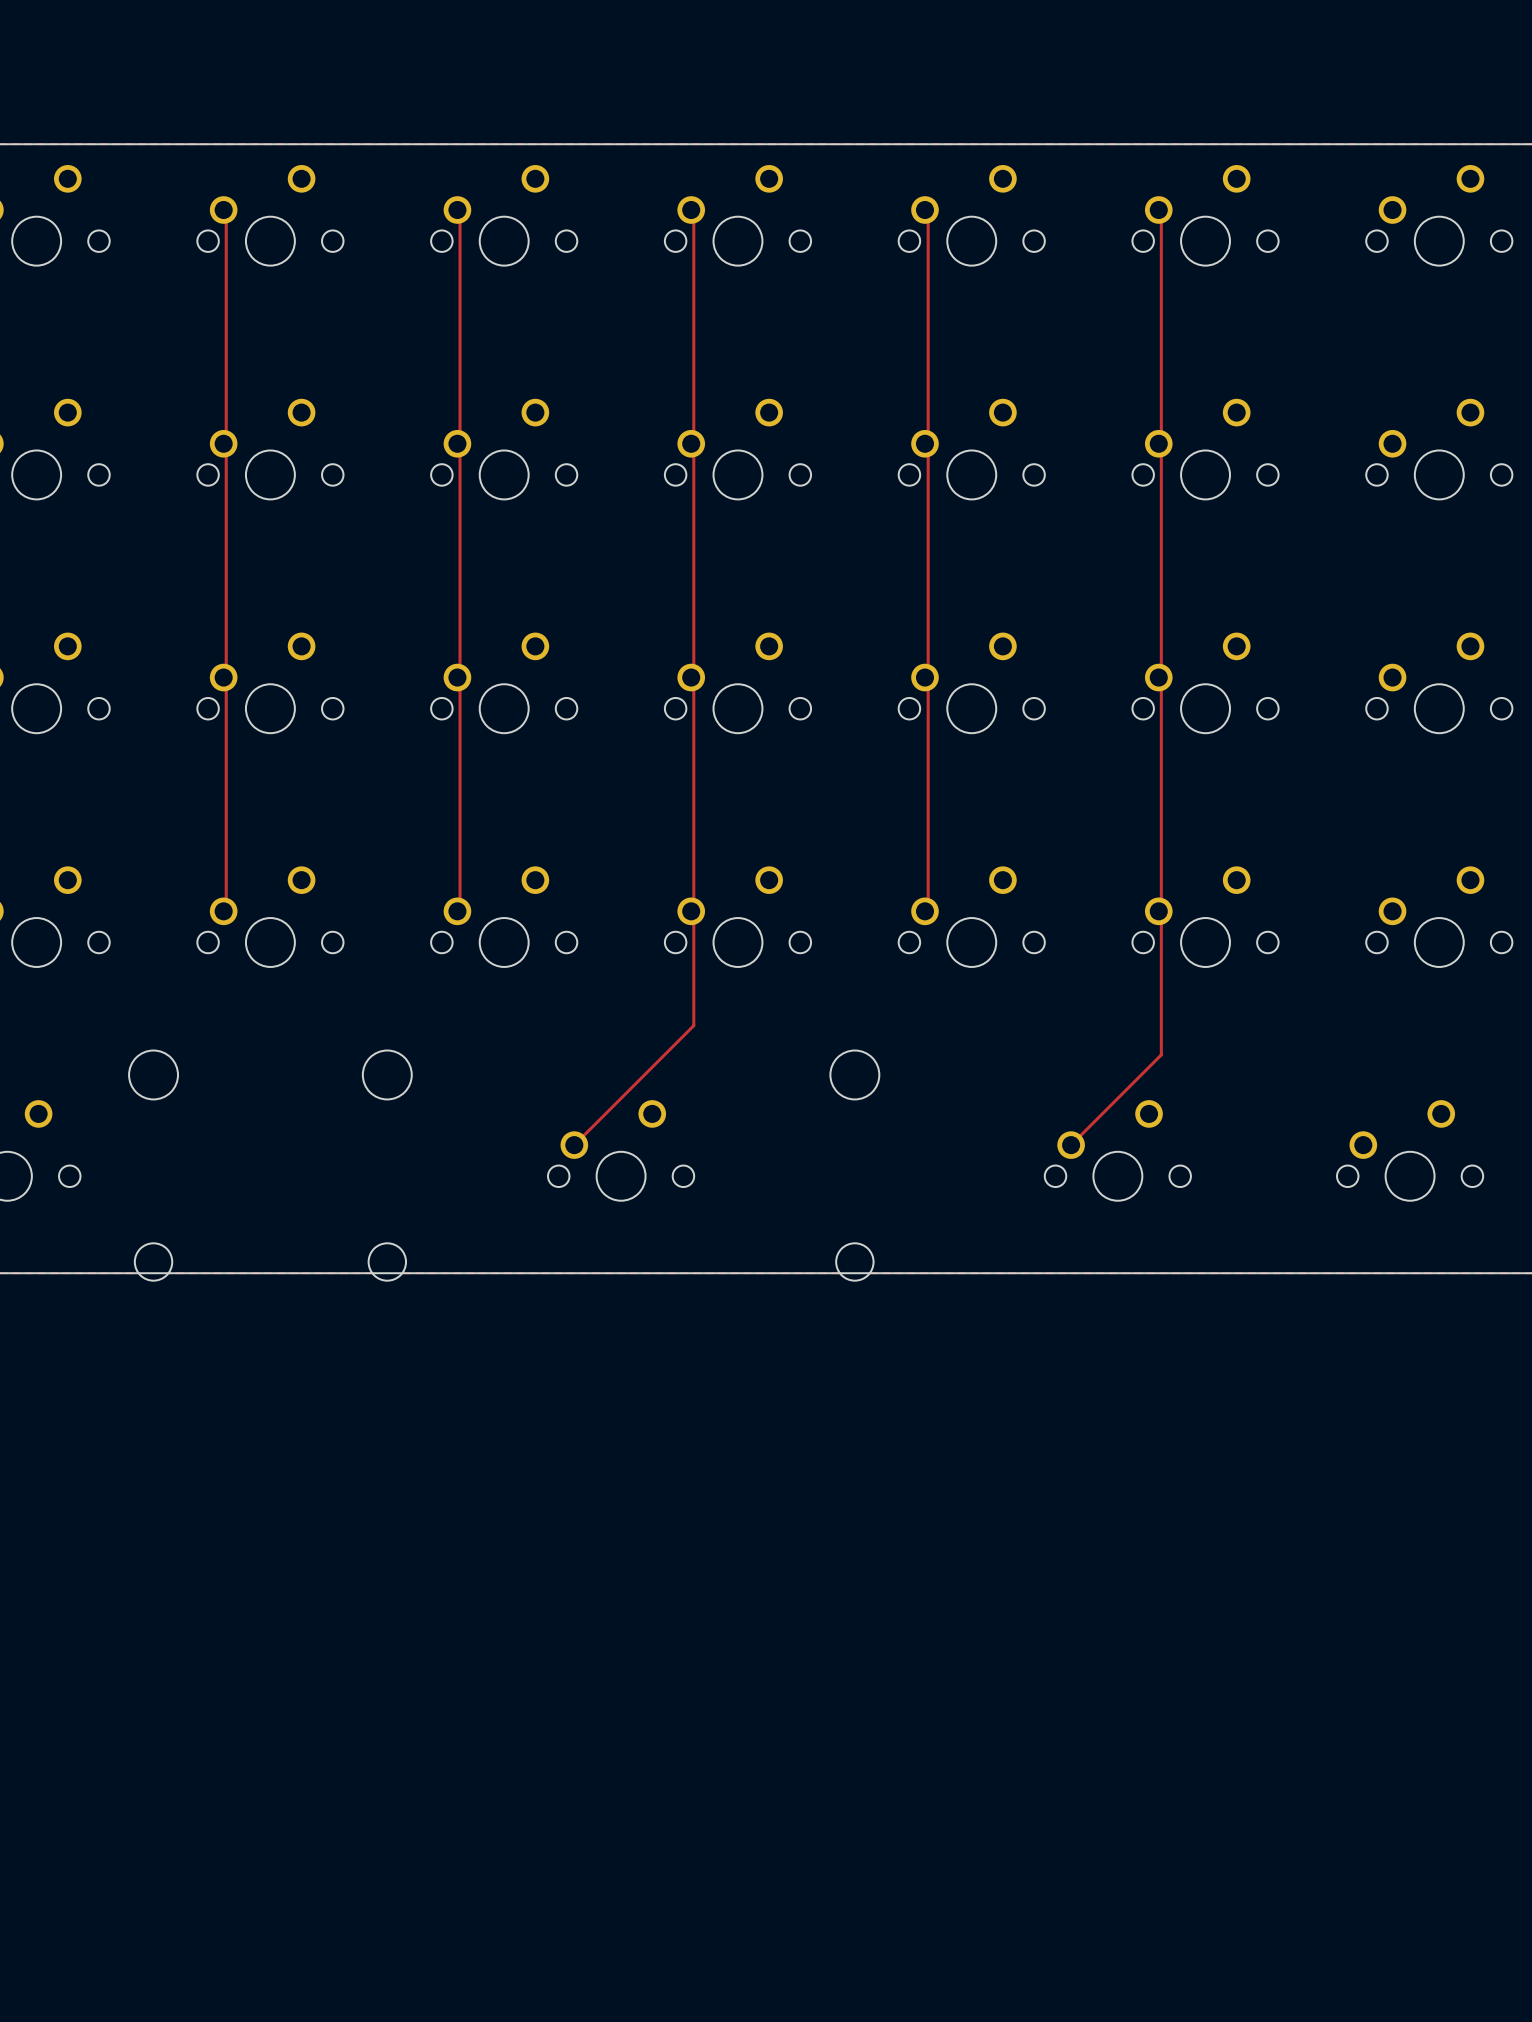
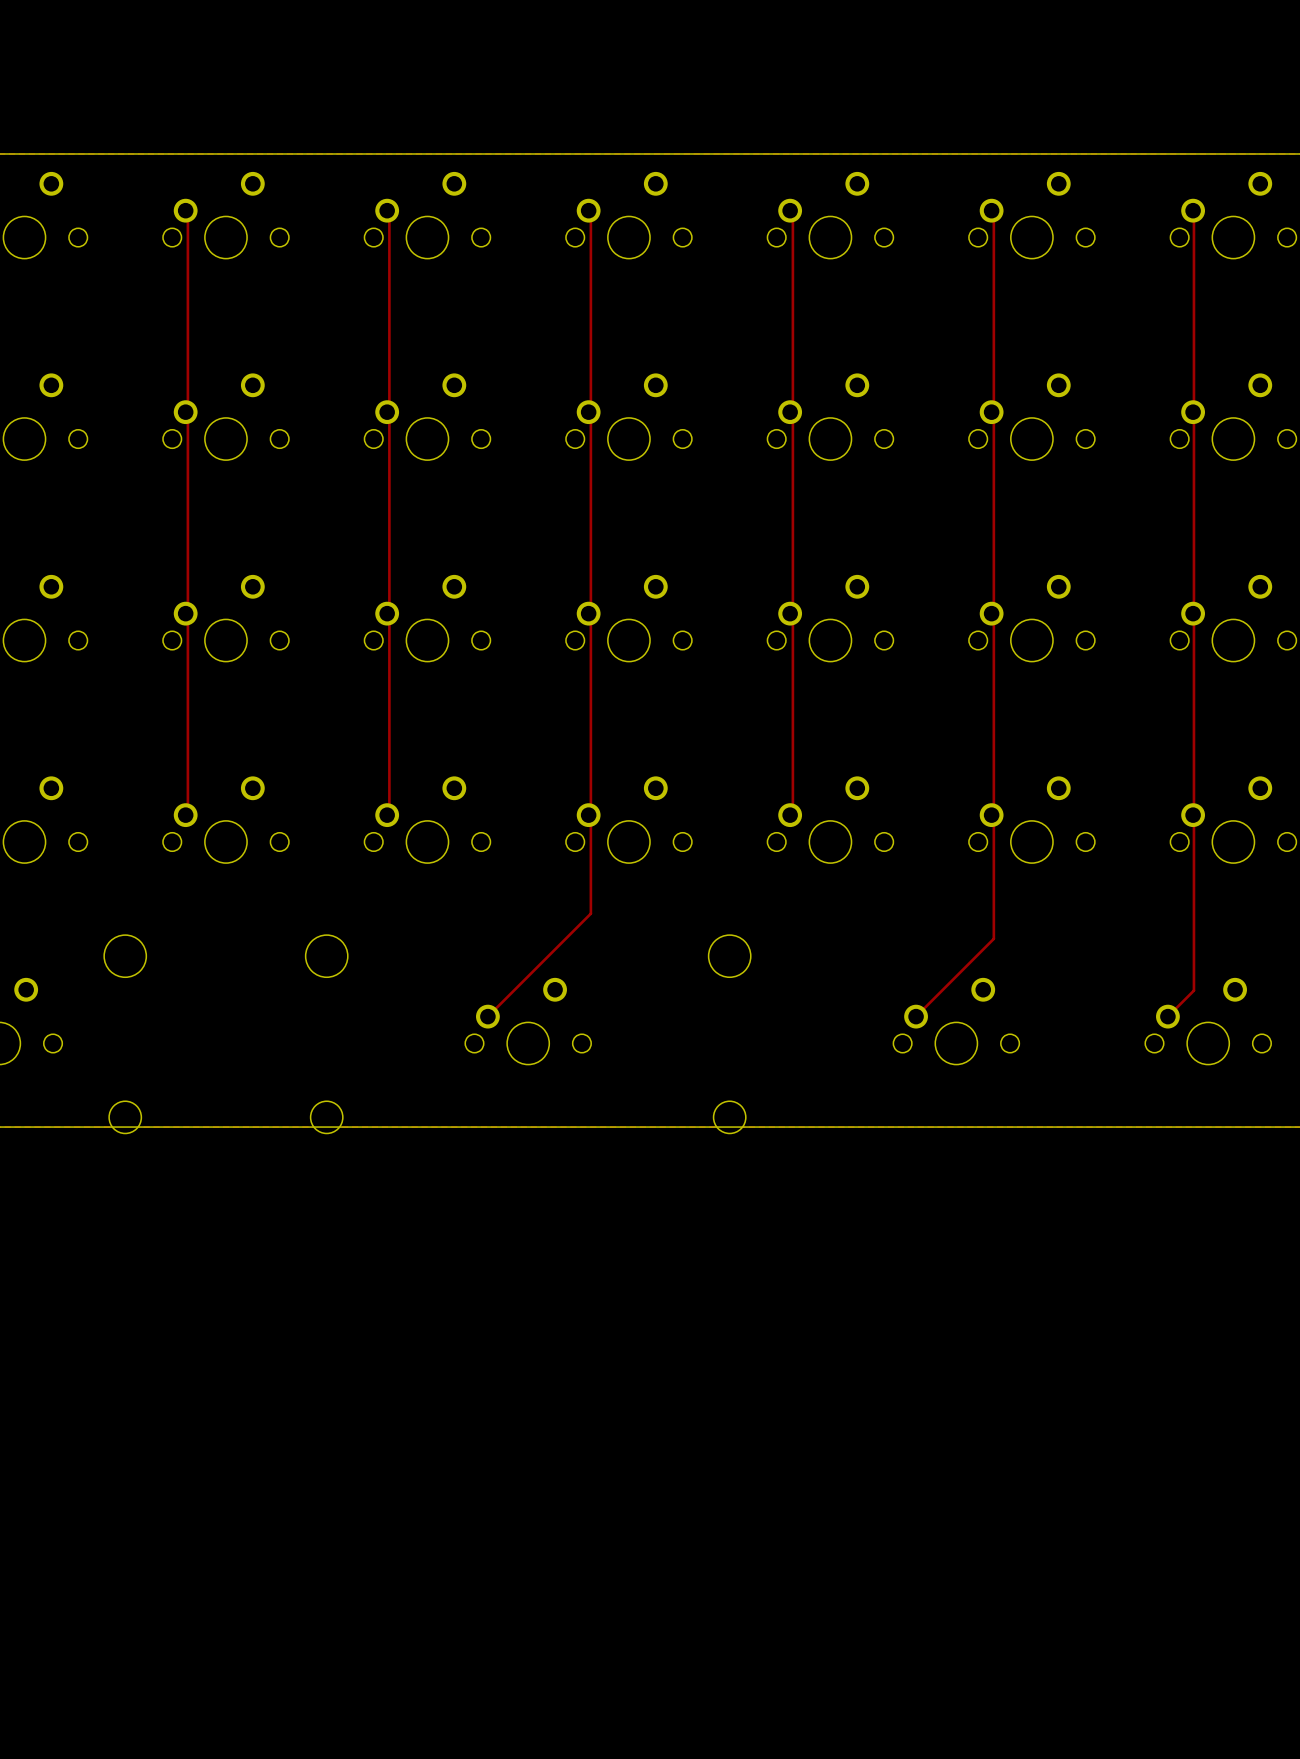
track: none -> (1193, 210) (1193, 990) (1167, 1016)

